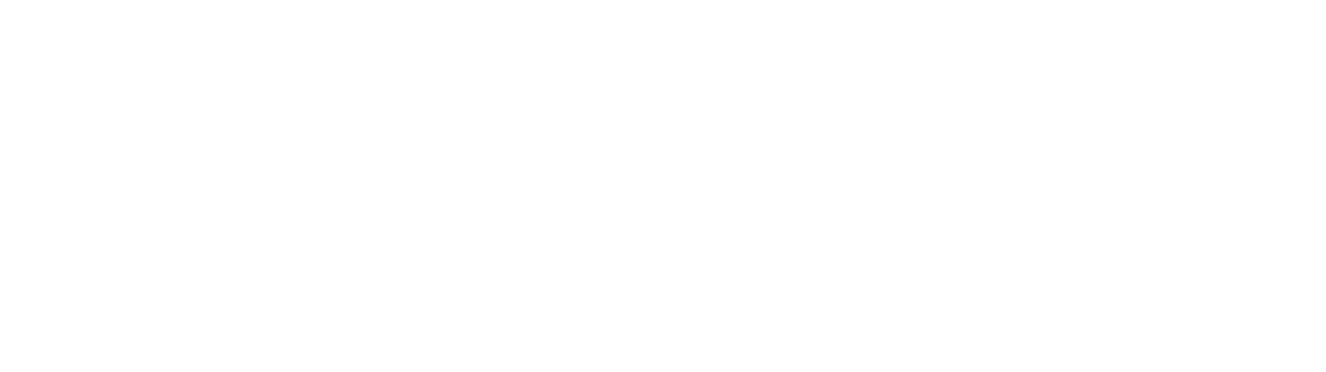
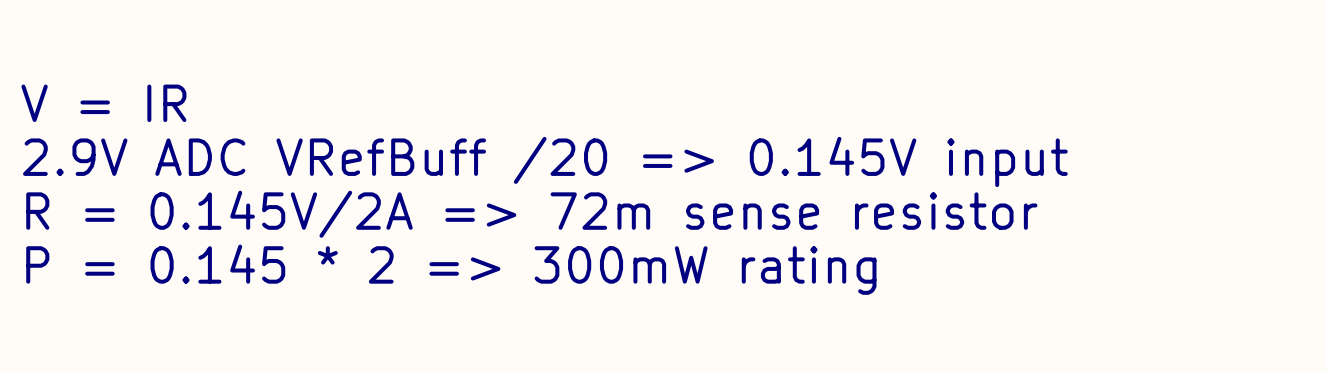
text: none -> V = IR (103, 103)
text: none -> 2.9V ADC VRefBuff /20 => 0.145V input (545, 161)
text: none -> R = 0.145V/2A => 72m sense resistor (531, 214)
text: none -> P = 0.145 * 2 => 300mW rating (451, 269)

